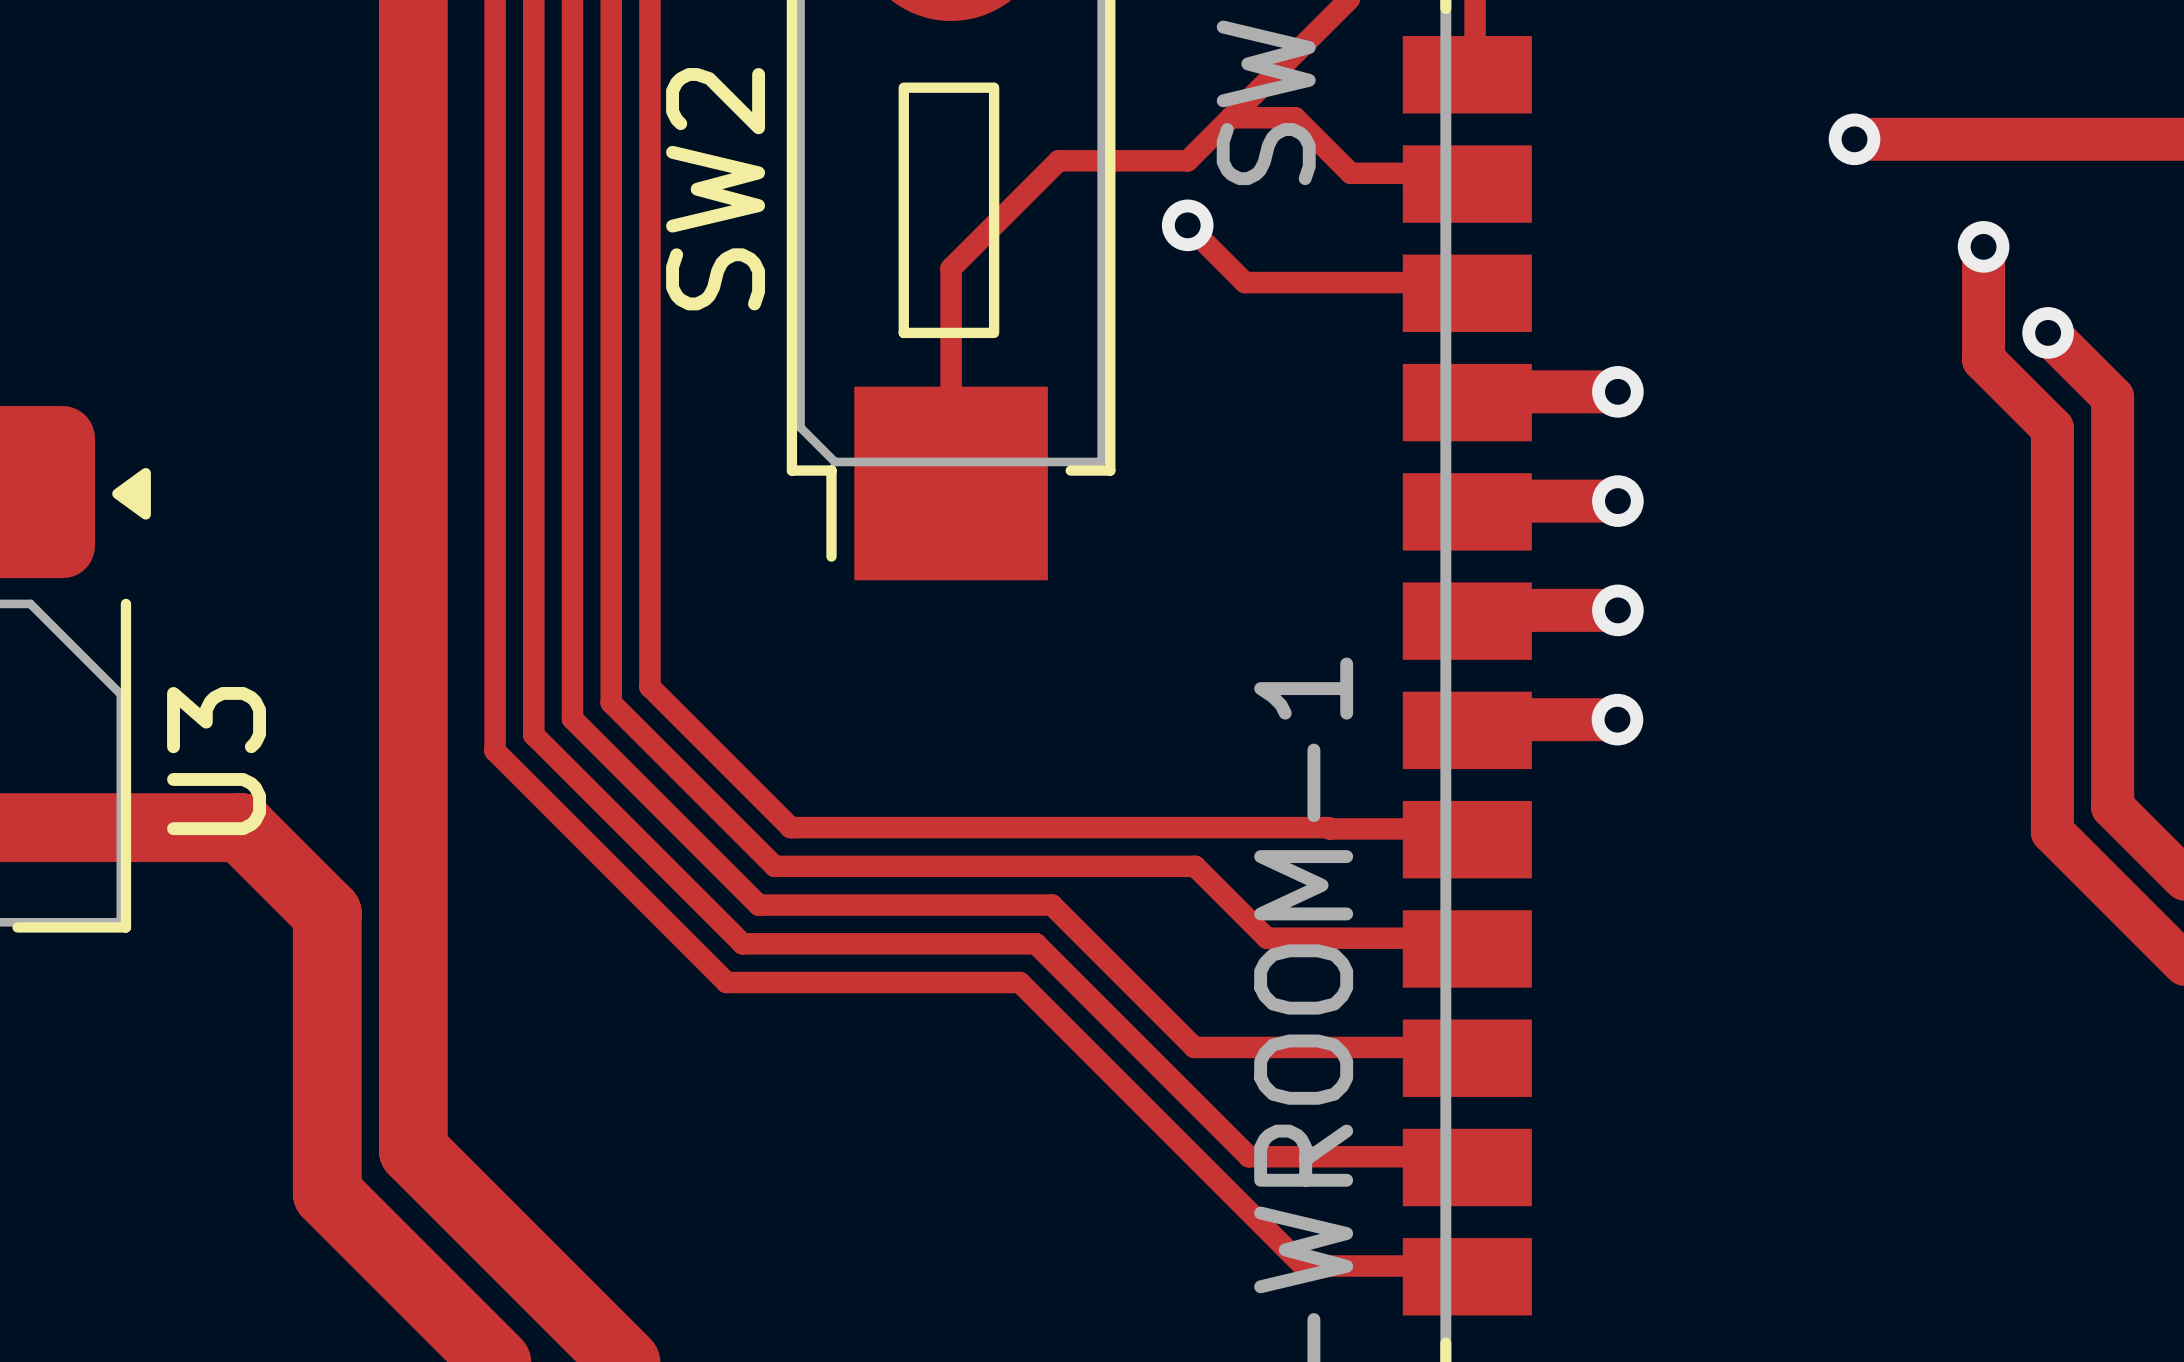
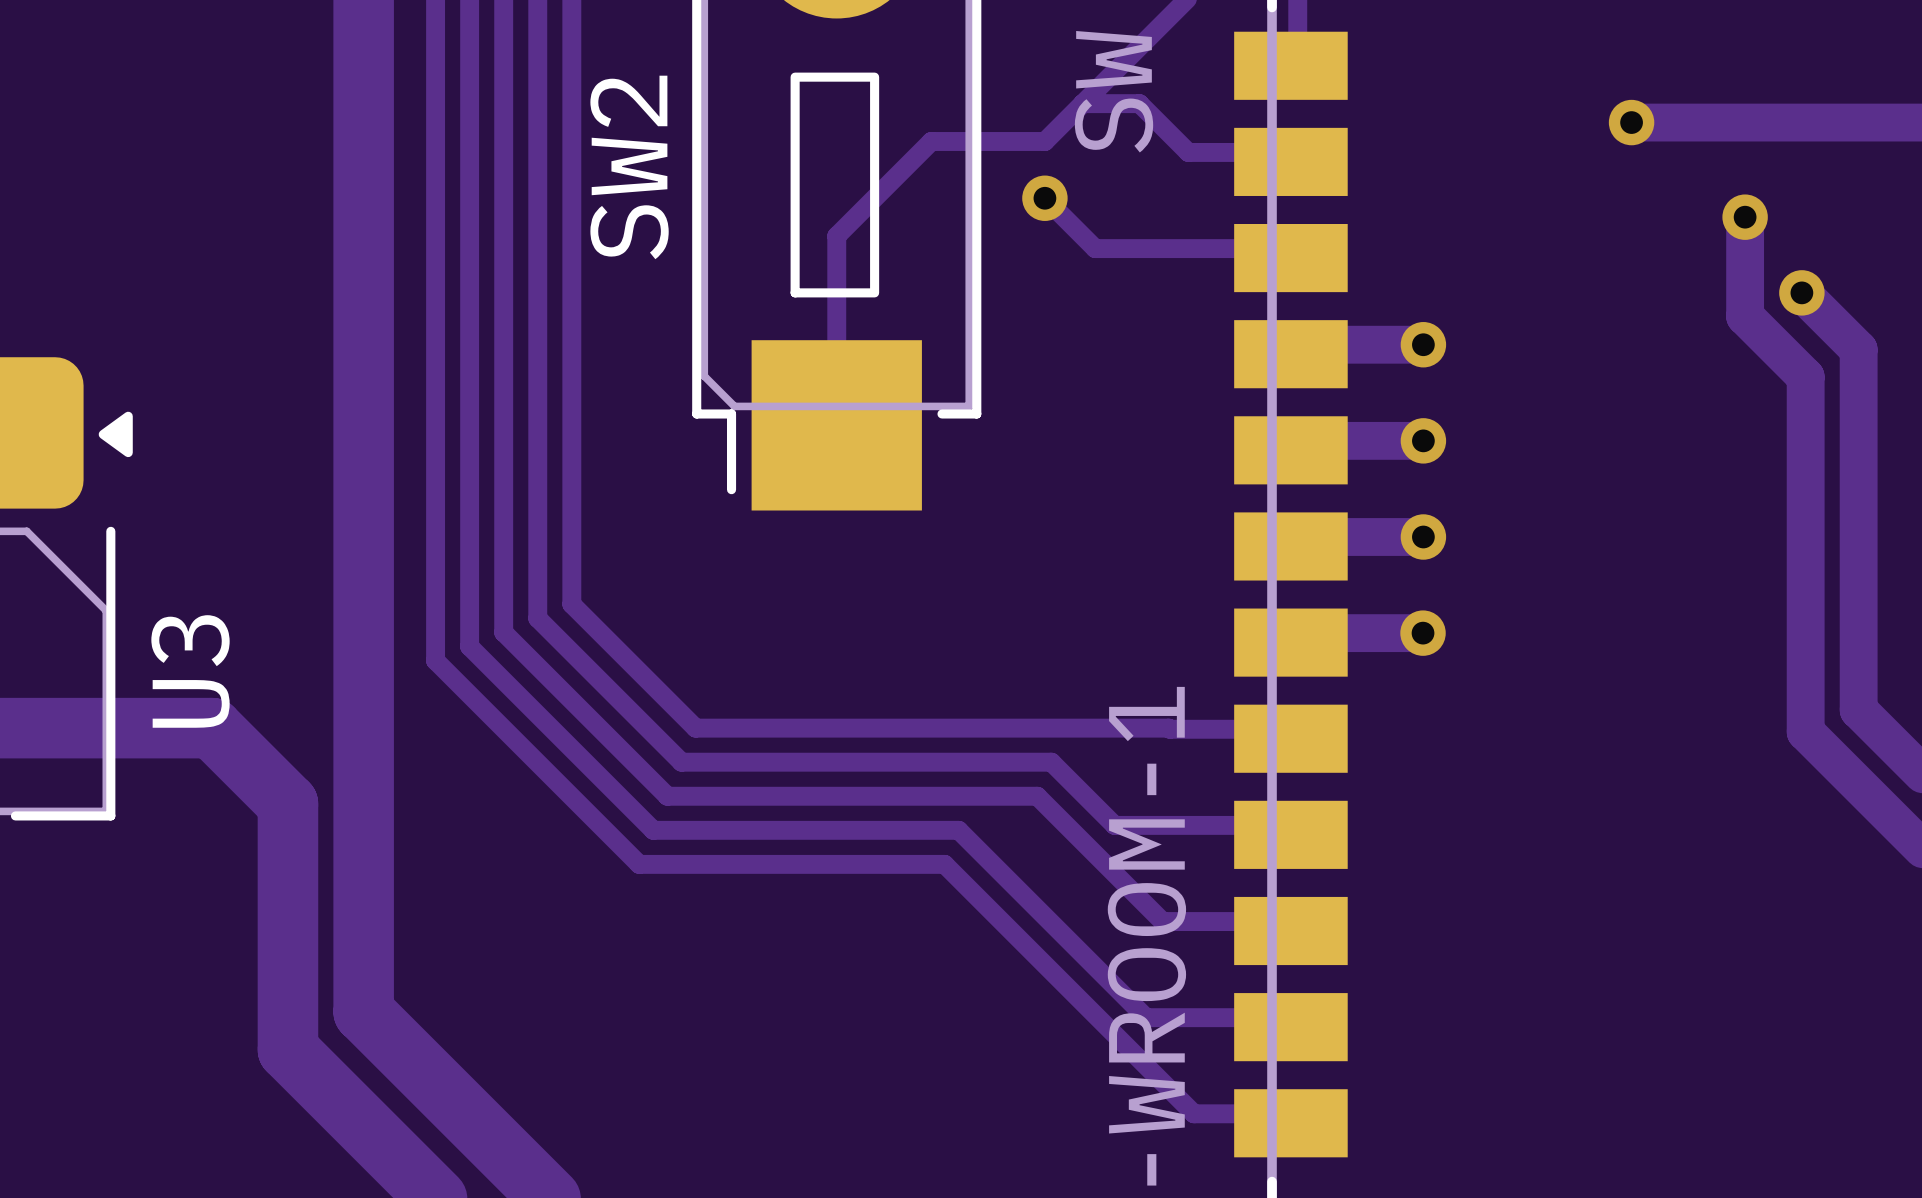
track: (1052, 905) (1194, 1047) (1321, 1047) -> (925, 796) (1037, 796) (1162, 921)
track: (1035, 943) (1248, 1156) (1302, 1156) -> (911, 830) (958, 830) (1146, 1017)
track: (1019, 982) (1303, 1266) (1357, 1266) -> (897, 864) (944, 864) (1194, 1113)

